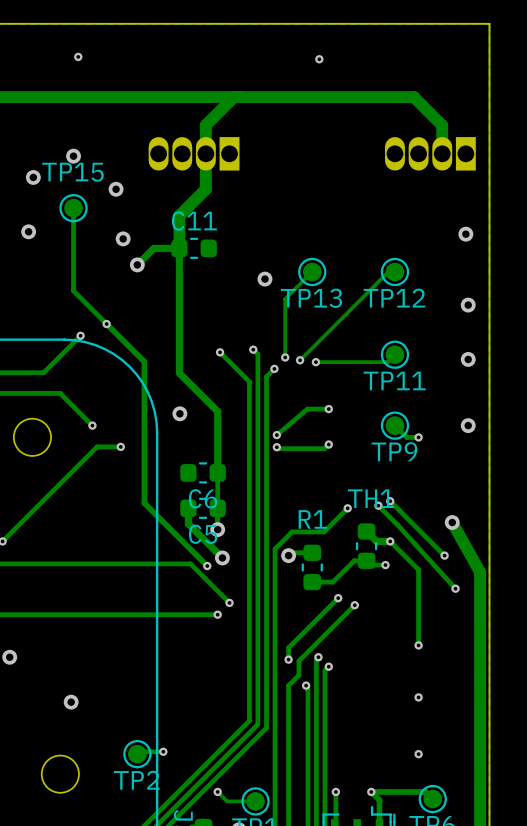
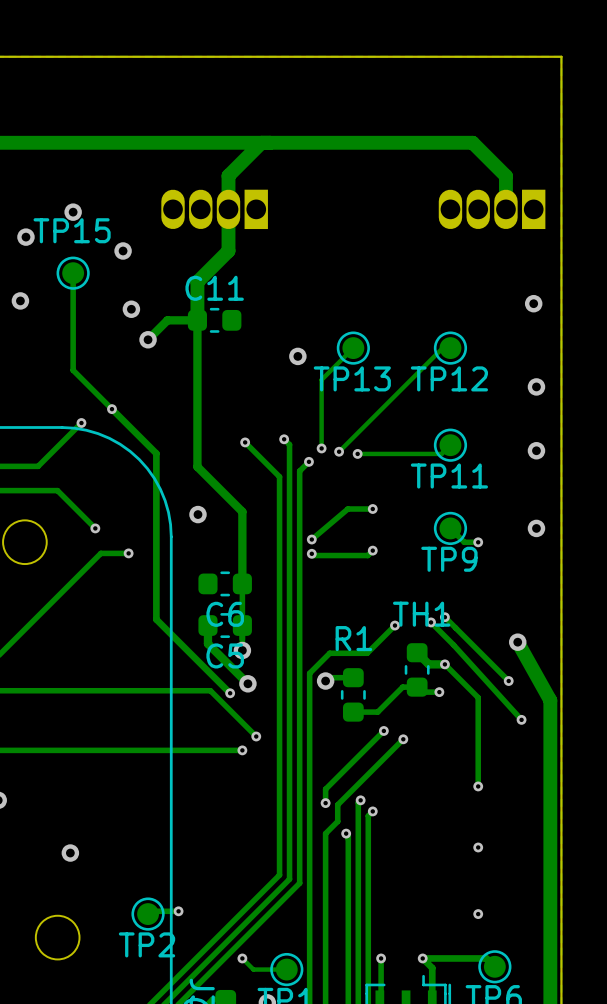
via: (78, 56) -> none
via: (319, 59) -> none

